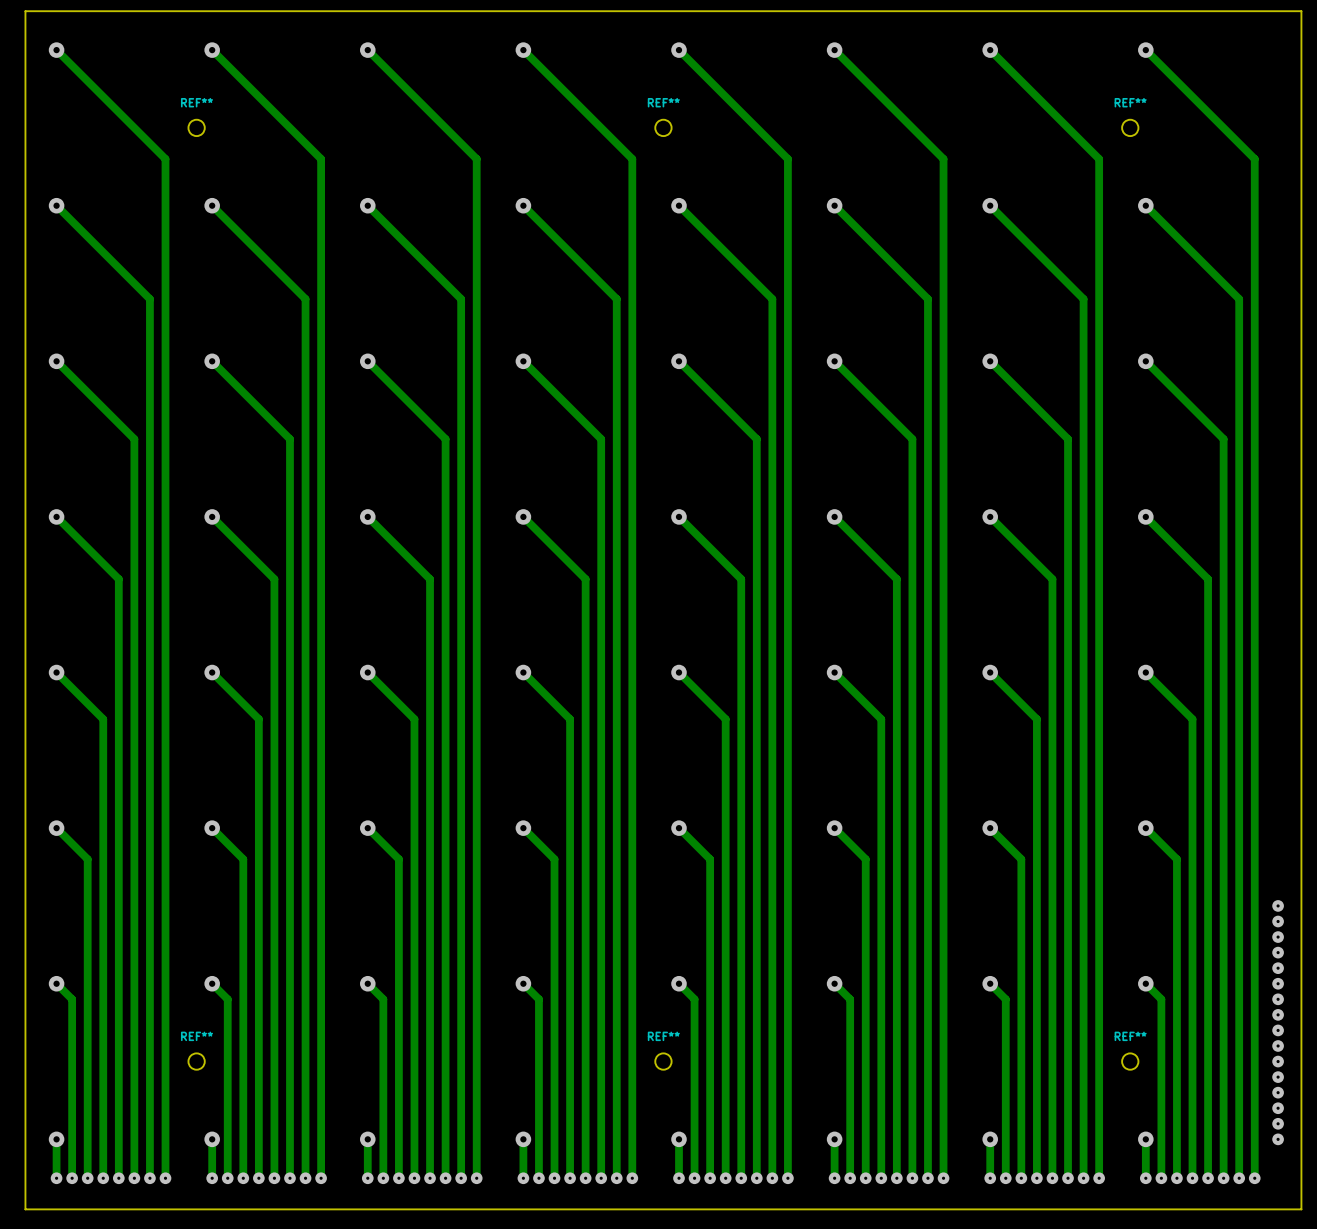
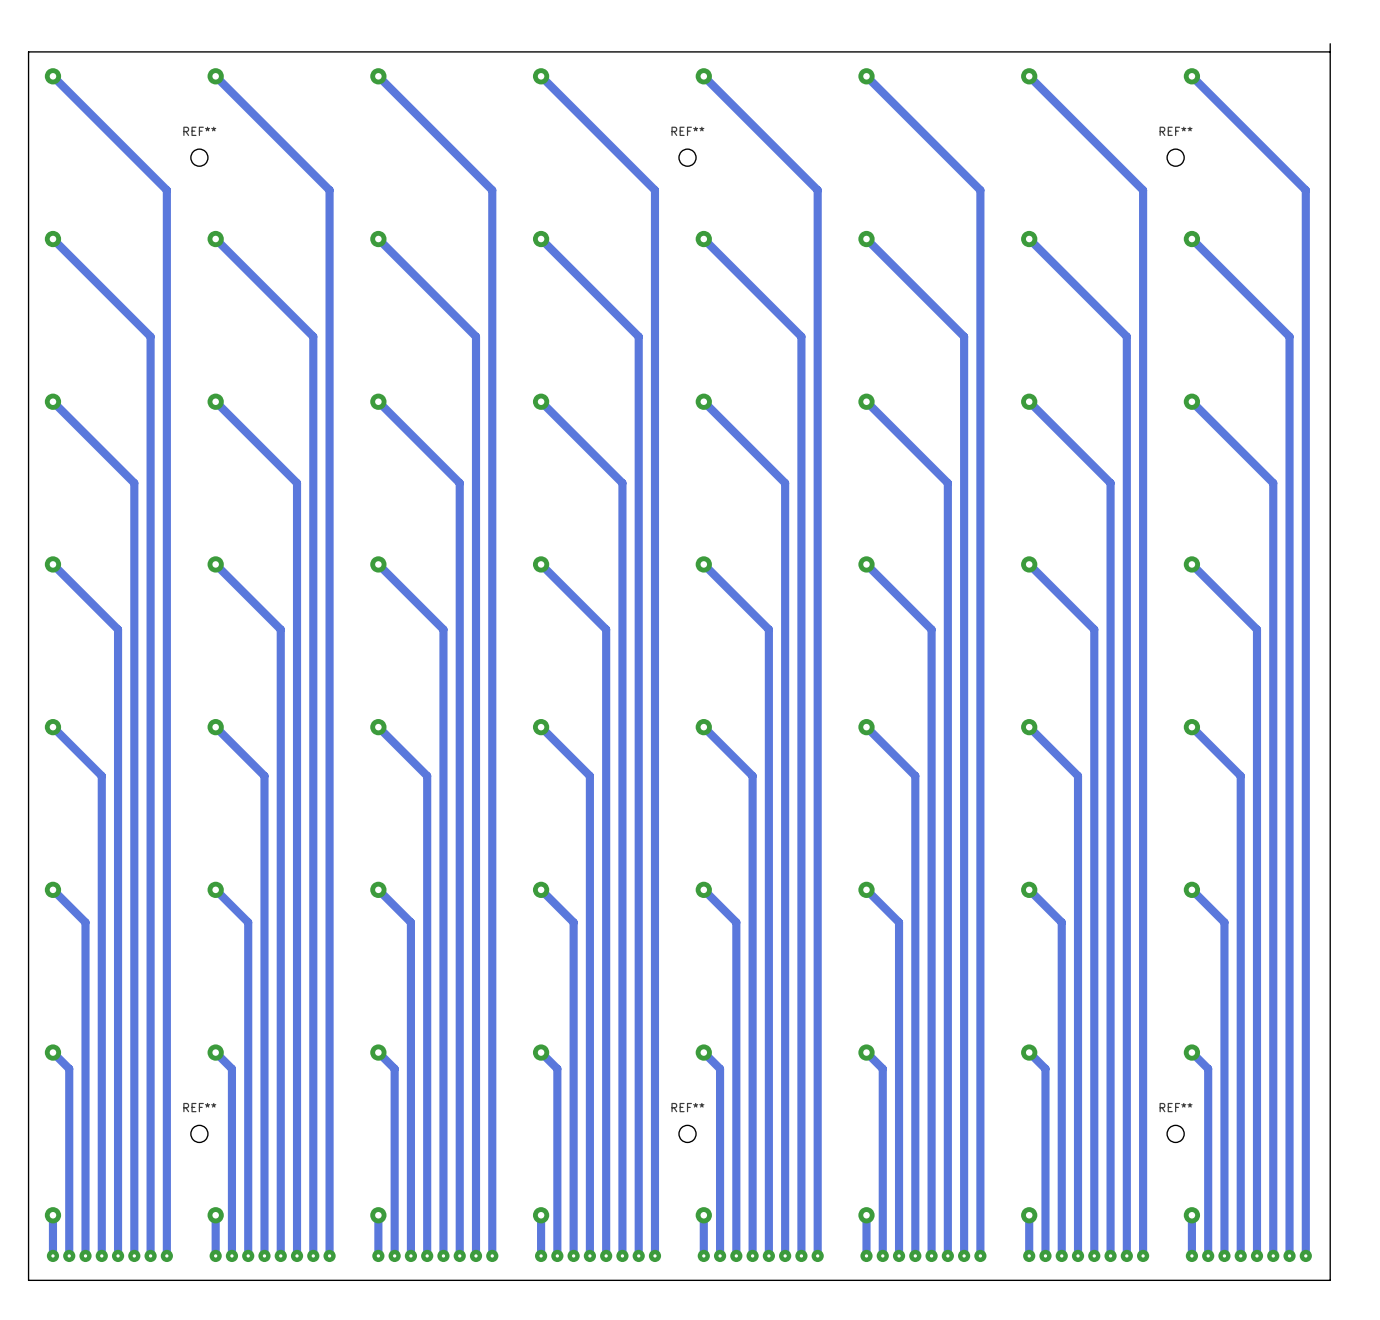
board edge: (25, 11) (25, 1209) (1301, 1209) (1301, 11) (25, 11) -> none
board edge: none -> (1330, 43) (1330, 1280) (28, 1280) (28, 51) (1330, 51)
via: (1278, 905) -> none
via: (1278, 921) -> none
via: (1278, 937) -> none
via: (1278, 952) -> none
via: (1278, 968) -> none
via: (1278, 983) -> none
via: (1278, 999) -> none
via: (1278, 1014) -> none
via: (1278, 1030) -> none
via: (1278, 1045) -> none
via: (1278, 1061) -> none
via: (1278, 1077) -> none
via: (1278, 1092) -> none
via: (1278, 1108) -> none
via: (1278, 1123) -> none
via: (1278, 1139) -> none

